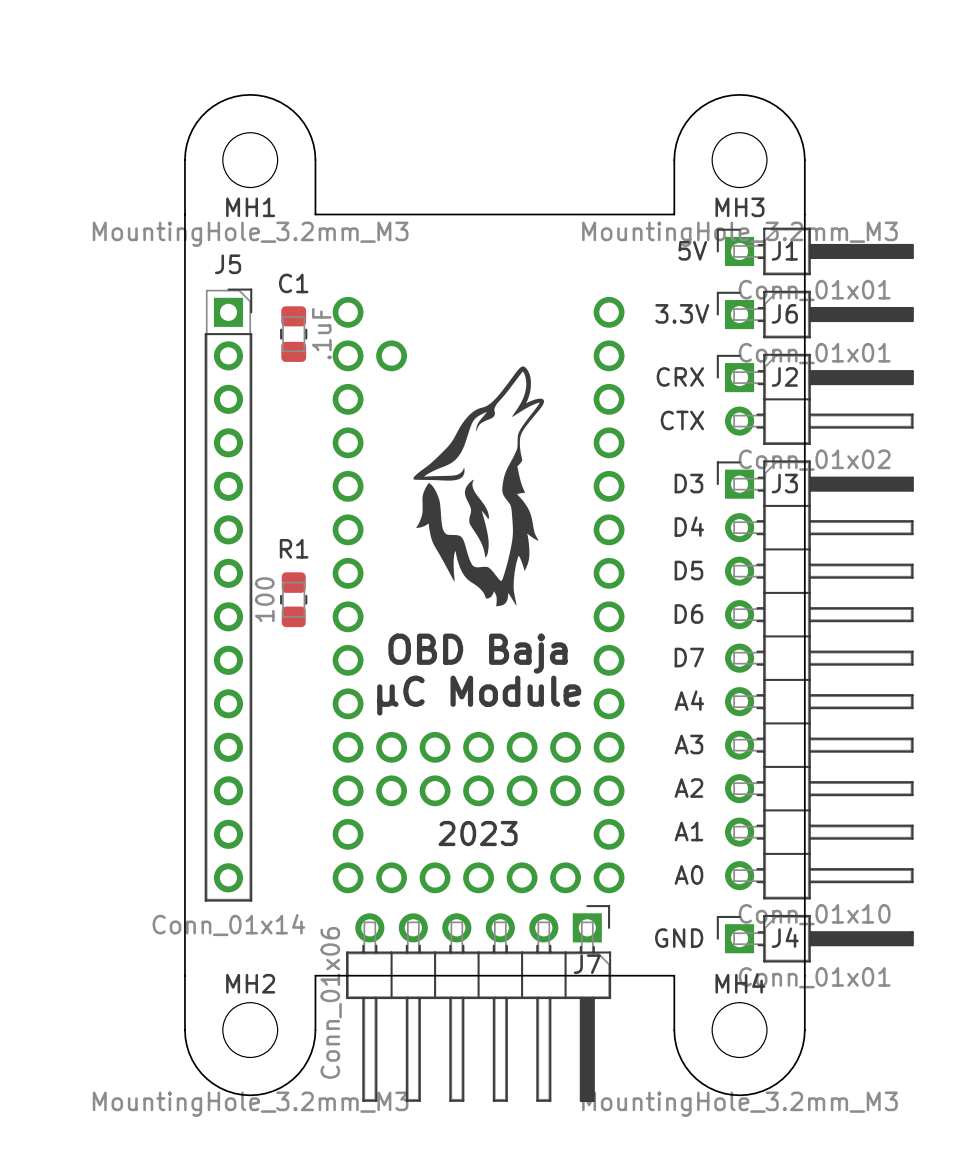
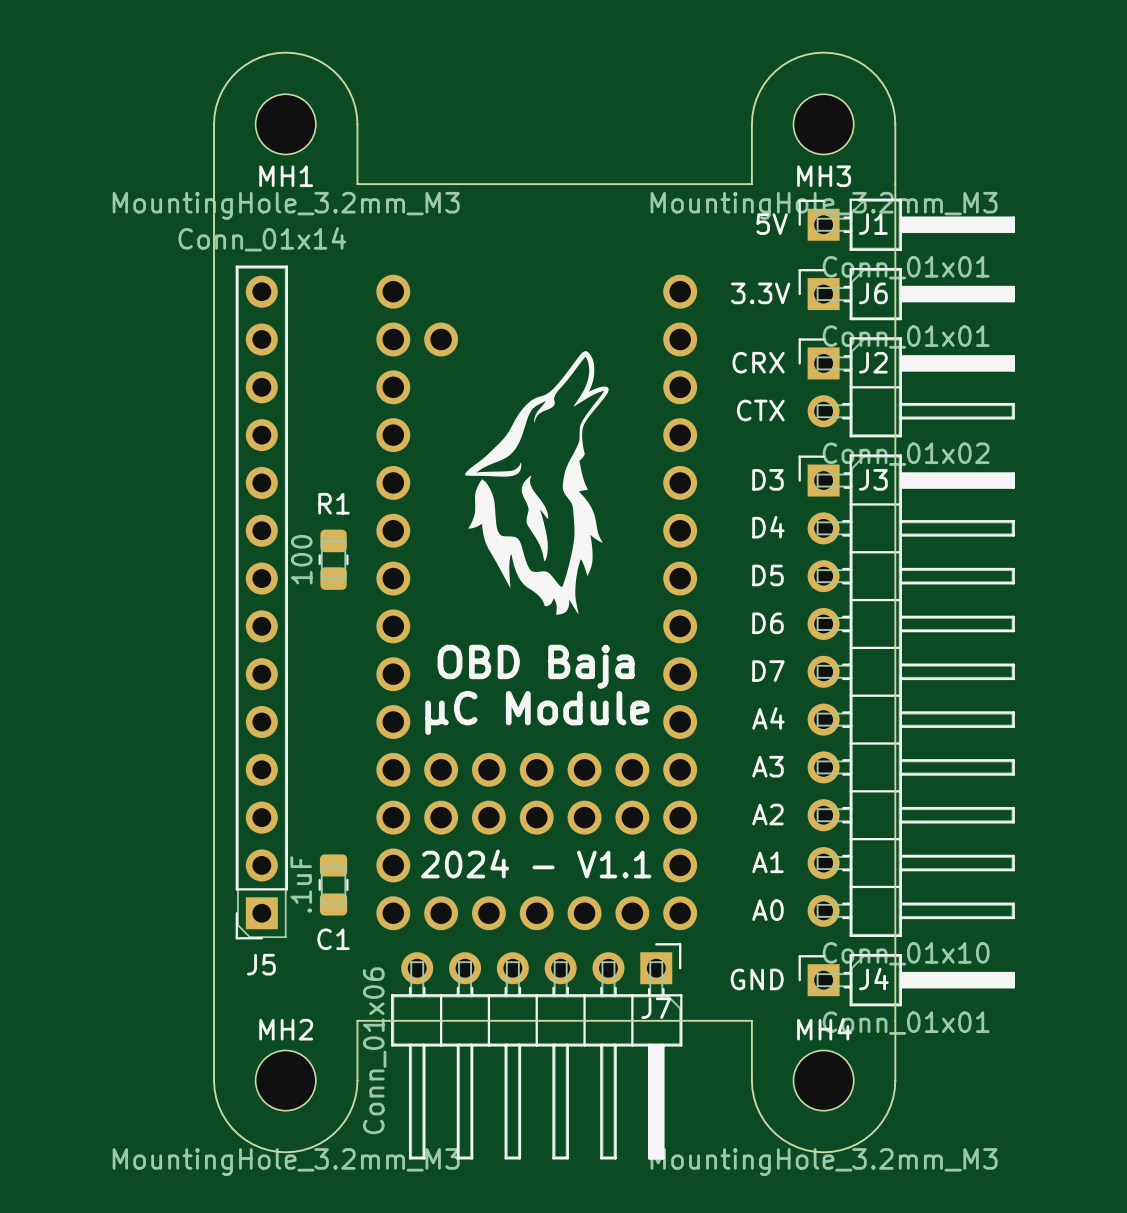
C1 name position: C1 (293, 283) -> C1 (333, 939)
C1 value position: .1uF (321, 333) -> .1uF (301, 884)
C1 position: (293, 334) -> (333, 884)
J5 rotation: 0° (228, 595) -> 180° (261, 602)
R1 position: (293, 599) -> (333, 559)
text: 2023 (478, 833) -> 2024 - V1.1 (536, 863)

